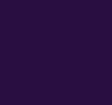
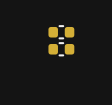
part: none -> (61, 32)
part: none -> (61, 49)

